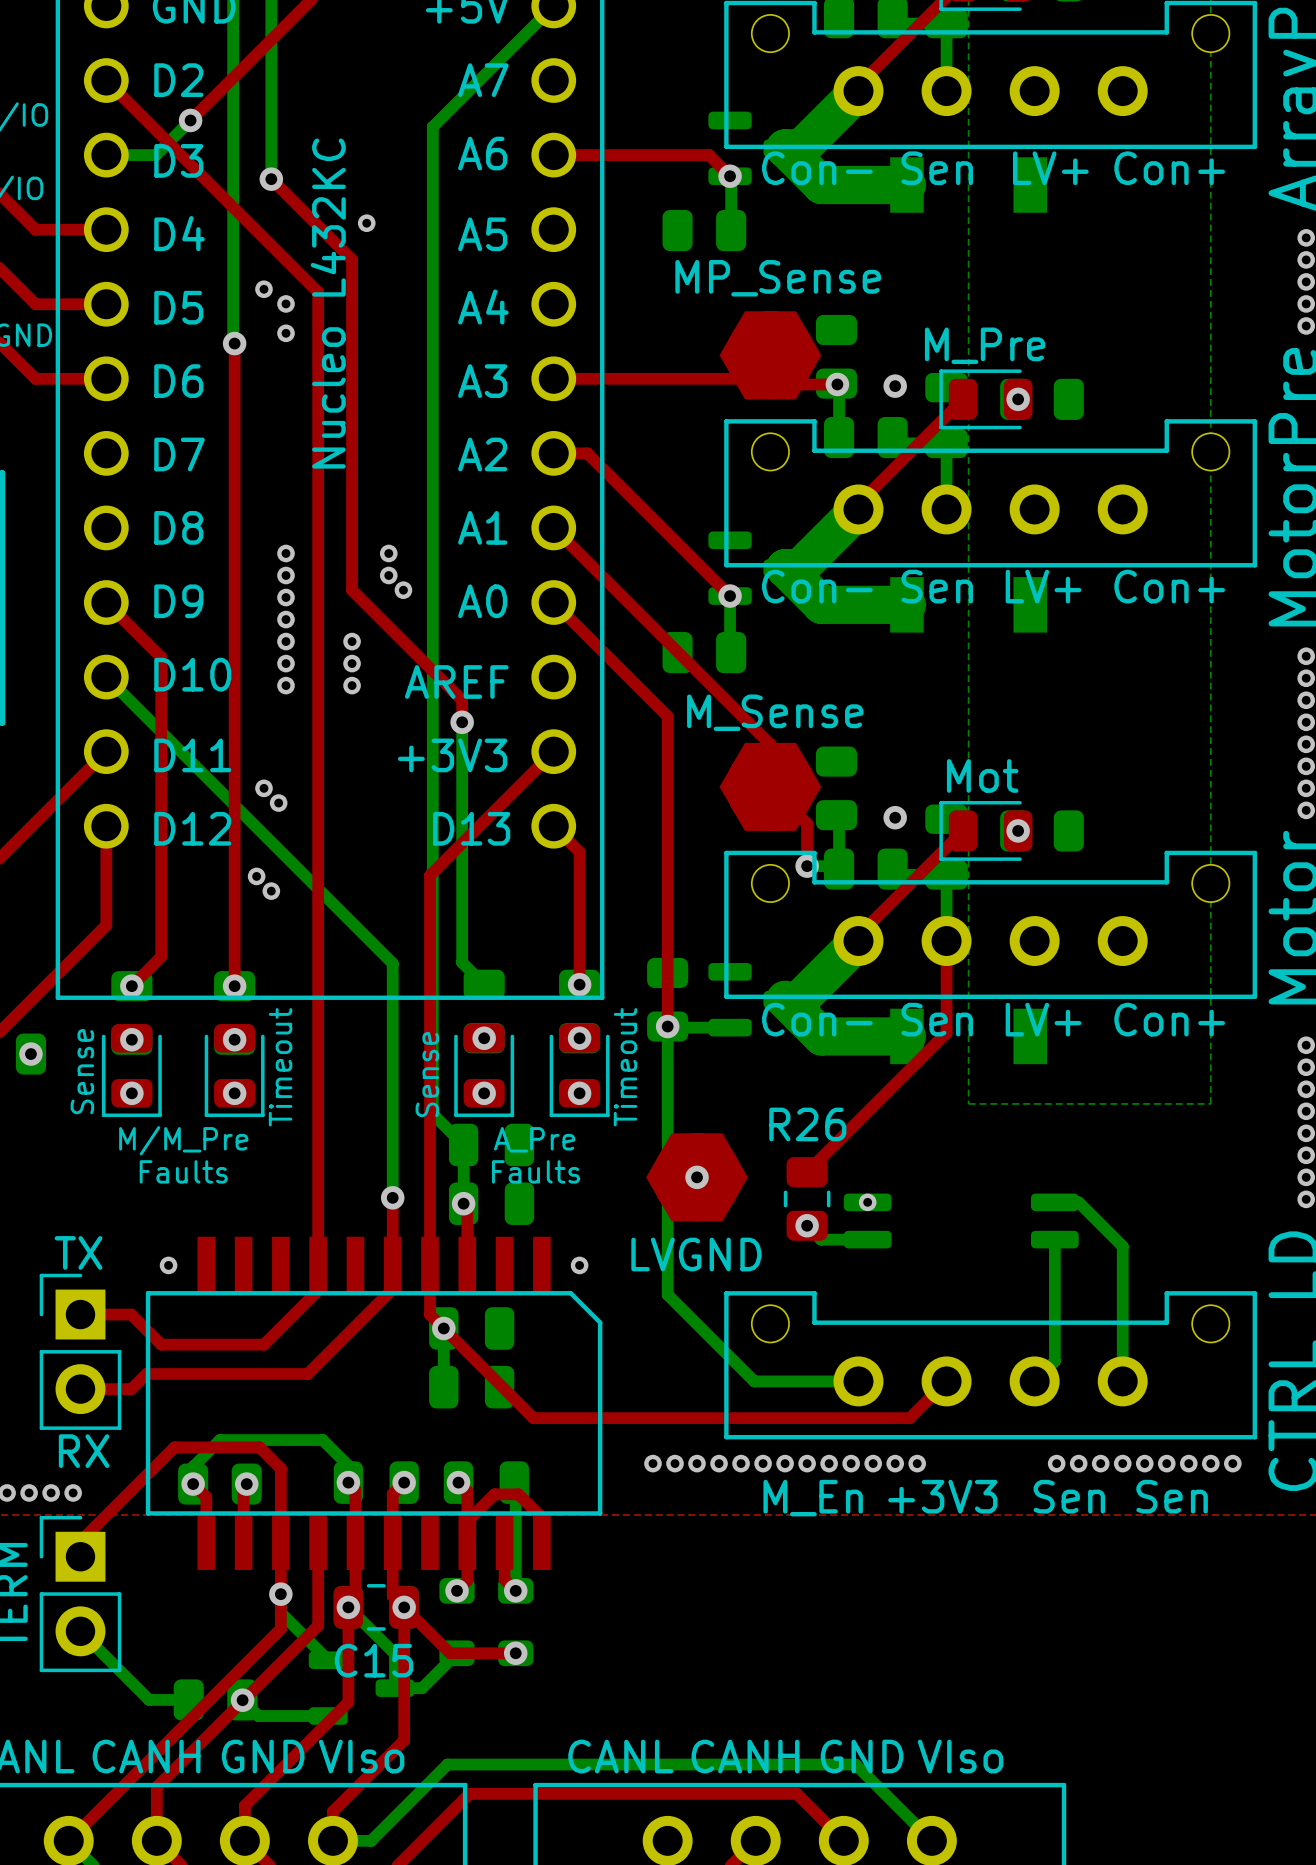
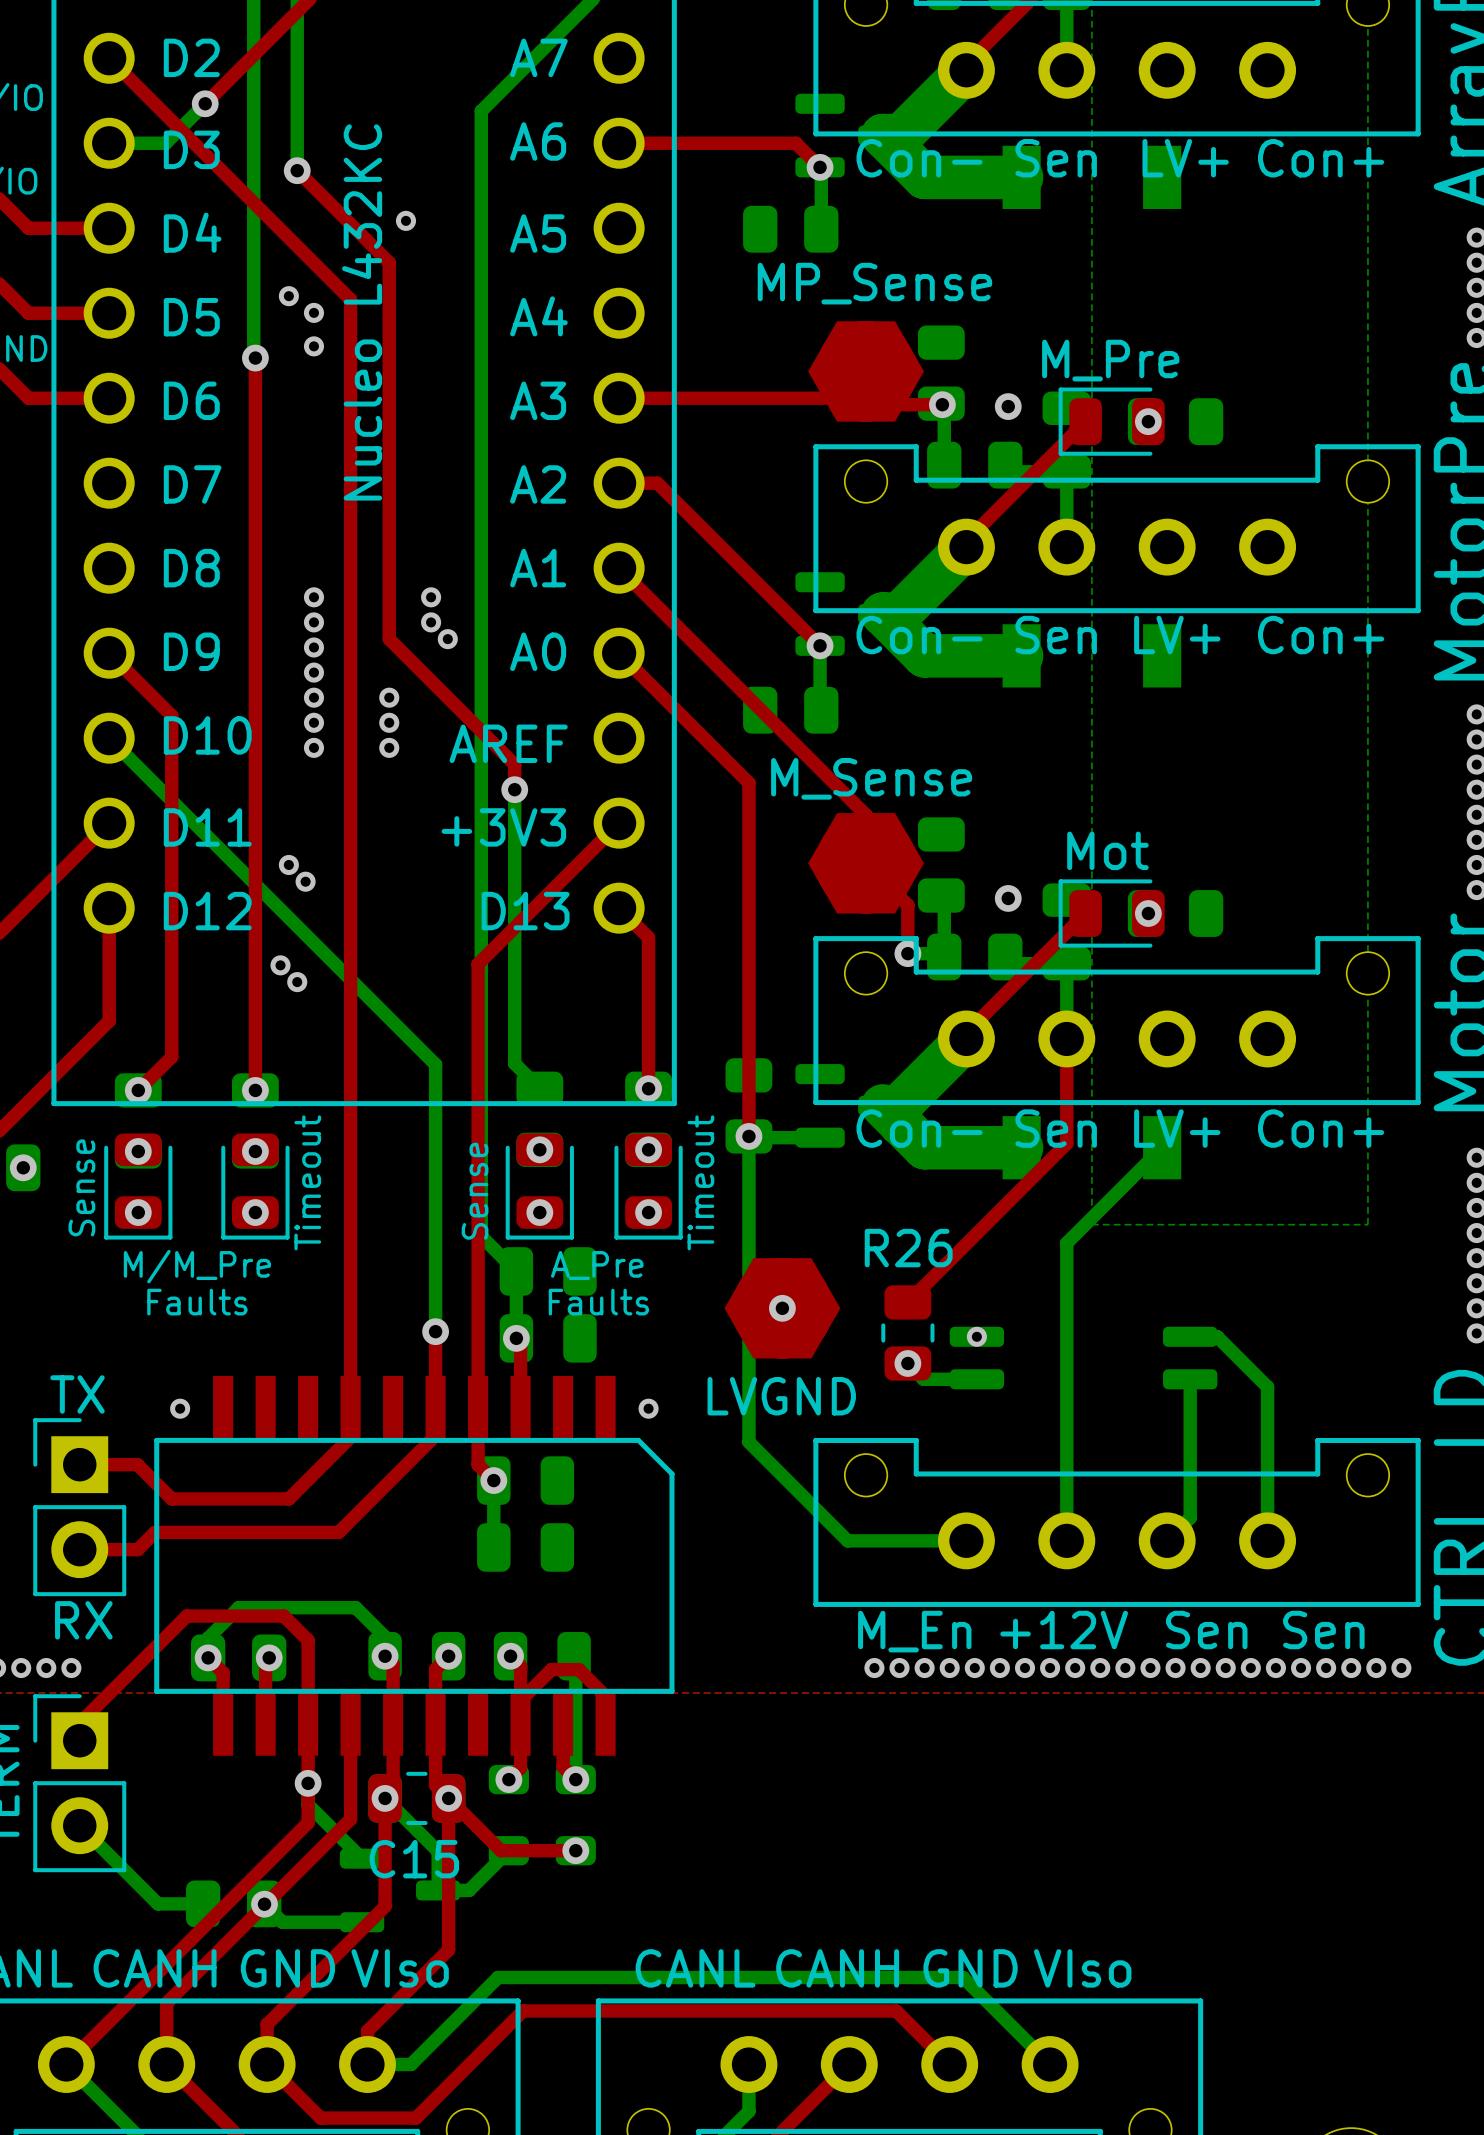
bottom track: none -> (1162, 1147) (1066, 1243) (1066, 1540)
top track: (443, 1328) (533, 1418) (909, 1418) (946, 1381) -> none
text: none -> +12V (1064, 1630)
via: (652, 1463) -> none
via: (675, 1463) -> none
via: (697, 1463) -> none
via: (719, 1463) -> none
via: (741, 1463) -> none
via: (763, 1463) -> none
via: (785, 1463) -> none
via: (807, 1463) -> none
via: (829, 1463) -> none
via: (851, 1463) -> none
via: (873, 1463) -> none
via: (895, 1463) -> none
via: (917, 1463) -> none
via: (1056, 1463) -> none
via: (1078, 1463) -> none
via: (1100, 1463) -> none
via: (1122, 1463) -> none
via: (1144, 1463) -> none
via: (1166, 1463) -> none
via: (1188, 1463) -> none
via: (1210, 1463) -> none
via: (1232, 1463) -> none
via: none -> (874, 1668)
via: none -> (899, 1668)
via: none -> (924, 1668)
via: none -> (949, 1668)
via: none -> (974, 1668)
via: none -> (999, 1668)
via: none -> (1024, 1668)
via: none -> (1050, 1668)
via: none -> (1075, 1668)
via: none -> (1100, 1668)
via: none -> (1125, 1668)
via: none -> (1150, 1668)
via: none -> (1175, 1668)
via: none -> (1200, 1668)
via: none -> (1225, 1668)
via: none -> (1250, 1668)
via: none -> (1275, 1668)
via: none -> (1301, 1668)
via: none -> (1326, 1668)
via: none -> (1351, 1668)
via: none -> (1376, 1668)
via: none -> (1401, 1668)
text: +3V3 (942, 1496) -> none
text position: Sen (1069, 1496) -> Sen (1206, 1630)
text position: Sen (1172, 1496) -> Sen (1323, 1630)
text position: M_En (813, 1498) -> M_En (914, 1631)

